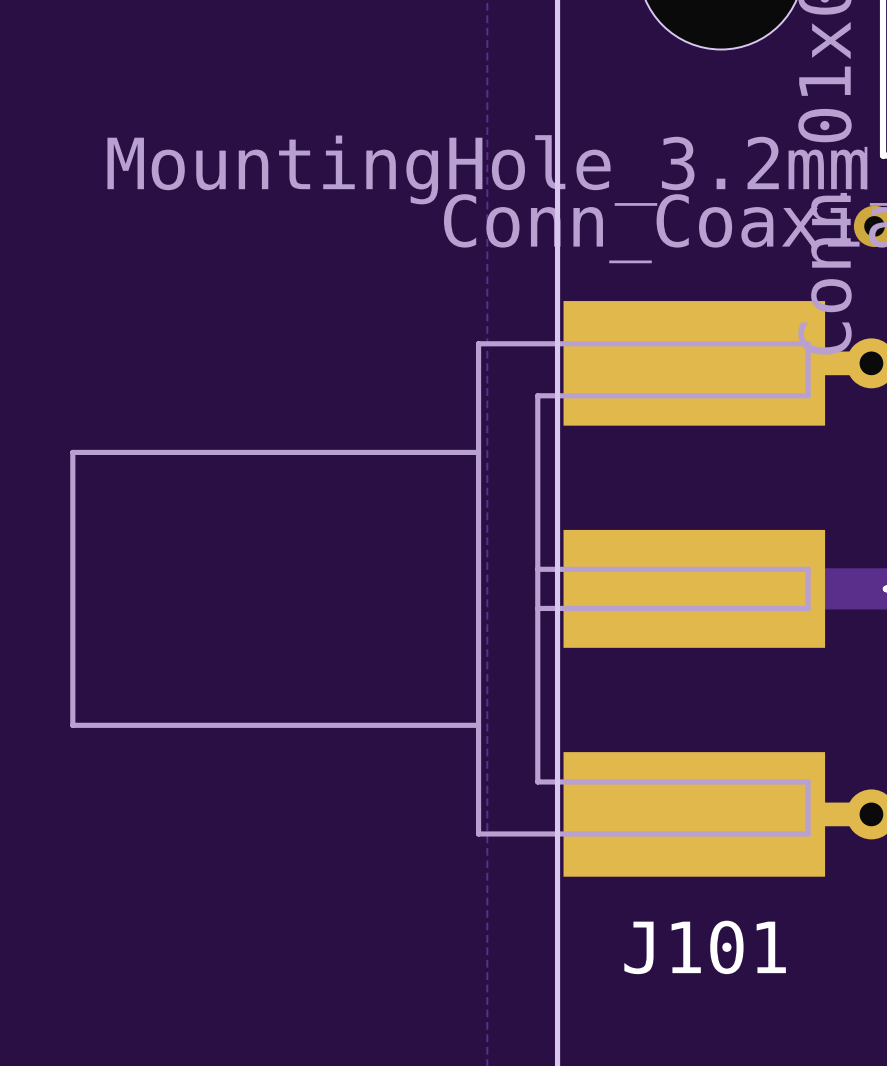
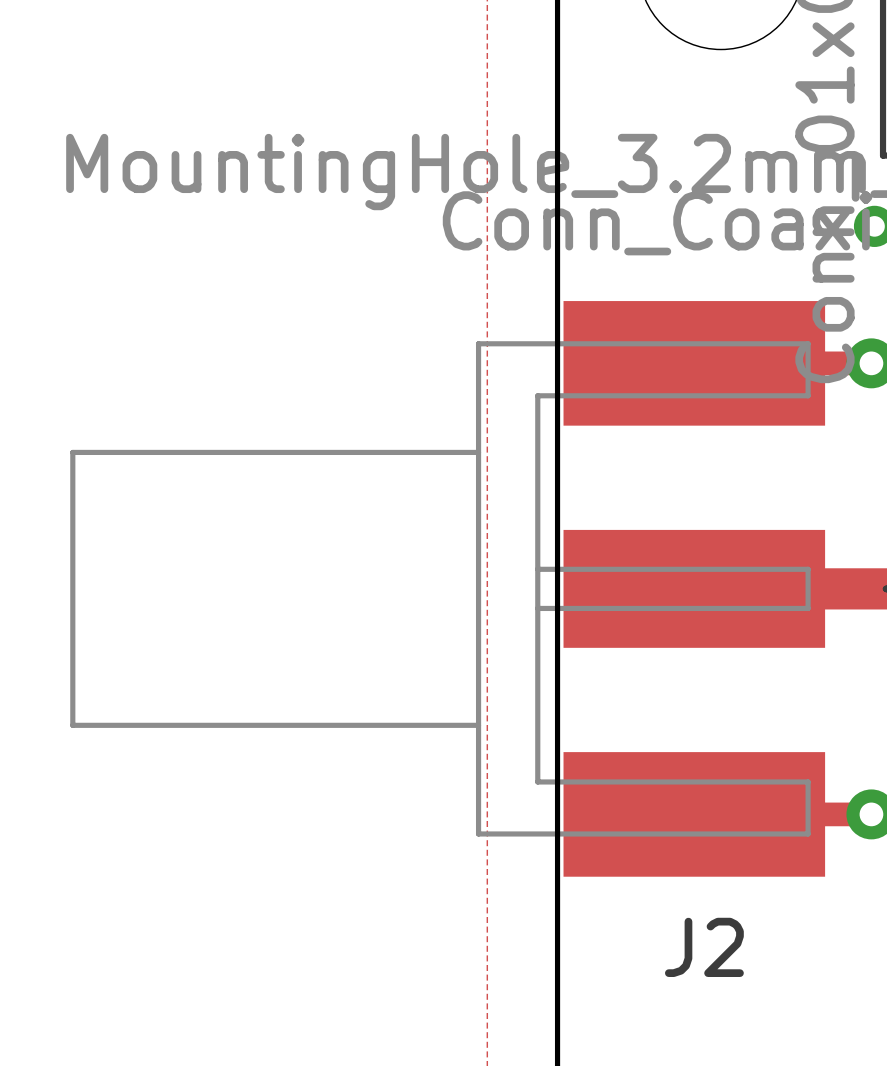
J101 name: J101 (705, 947) -> J2 (704, 947)

